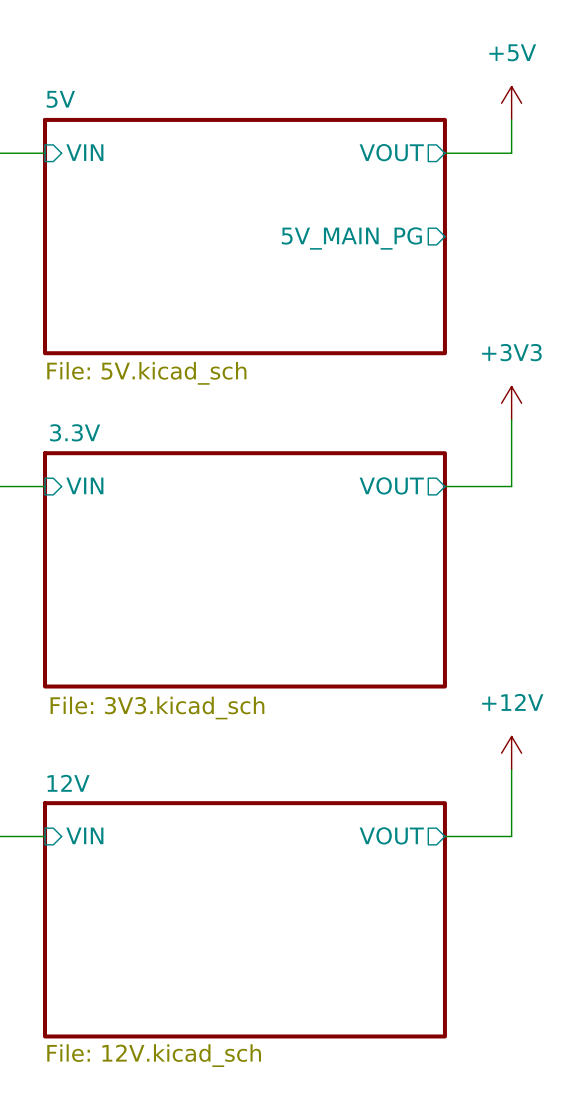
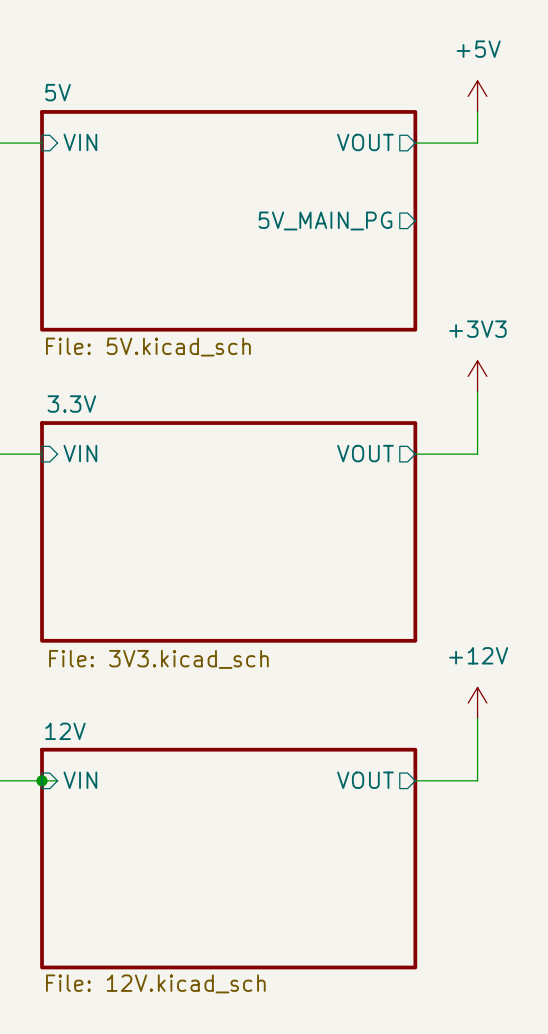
wire: none -> (42, 780) (57, 780)
junction: none -> (42, 780)

